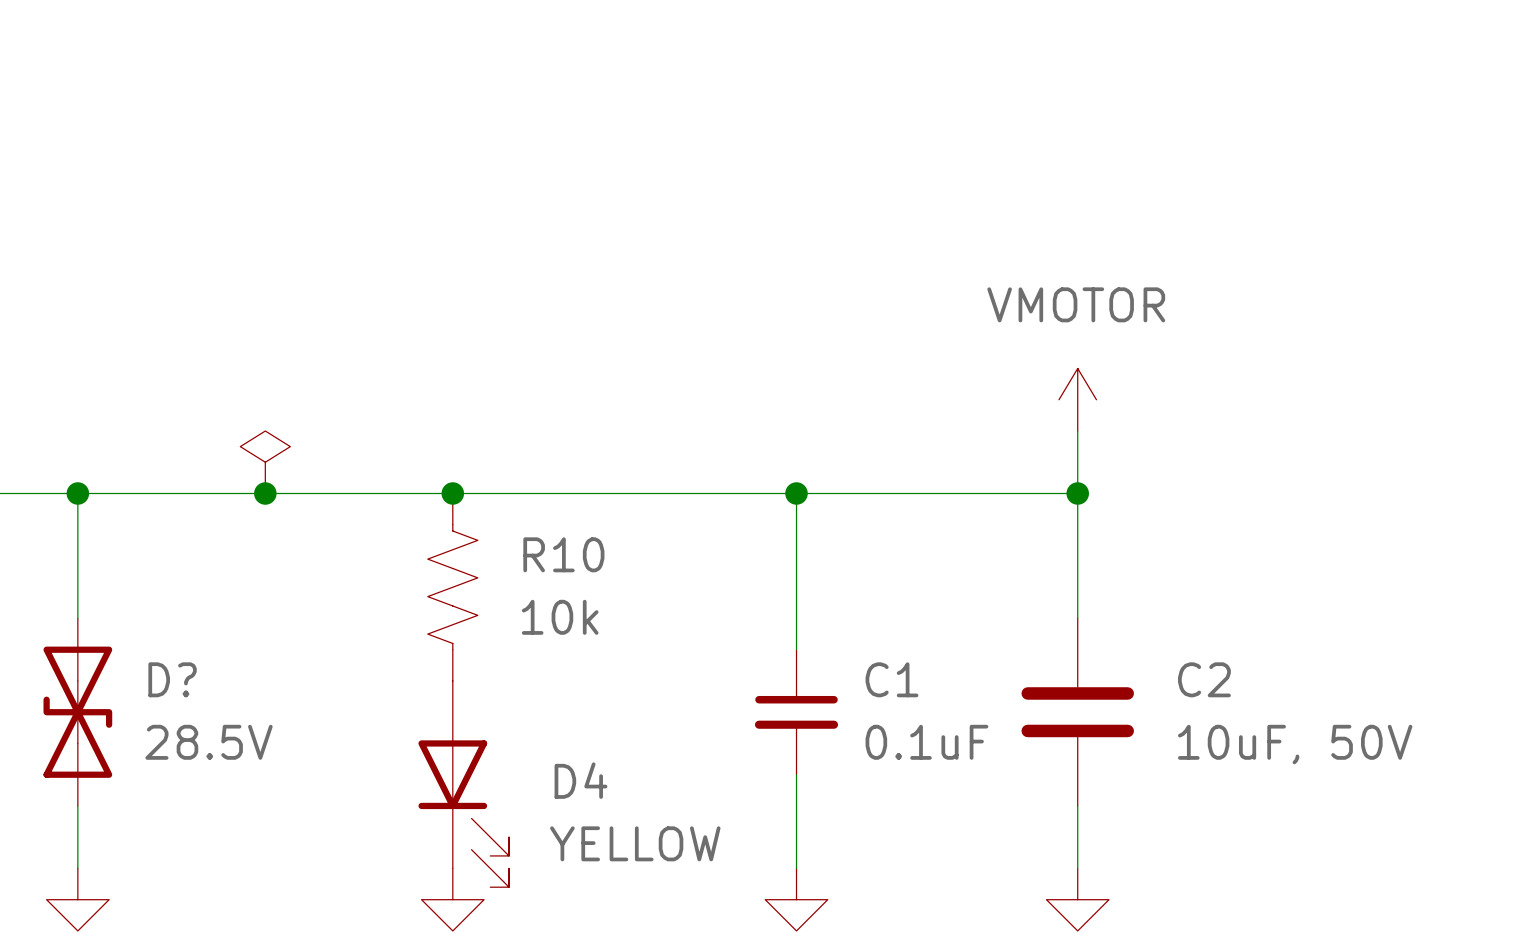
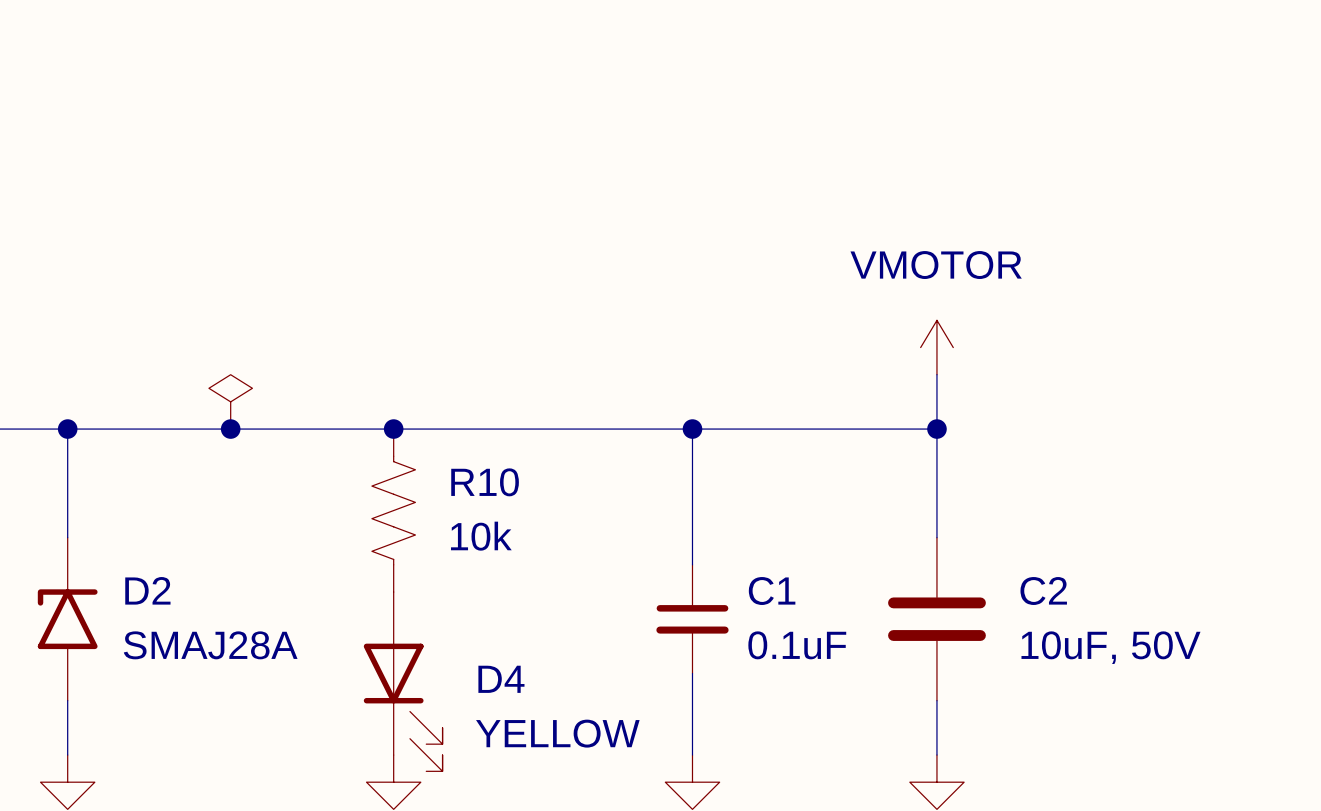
D?: 28.5V (77, 712) -> none
D2: none -> SMAJ28A (67, 619)

